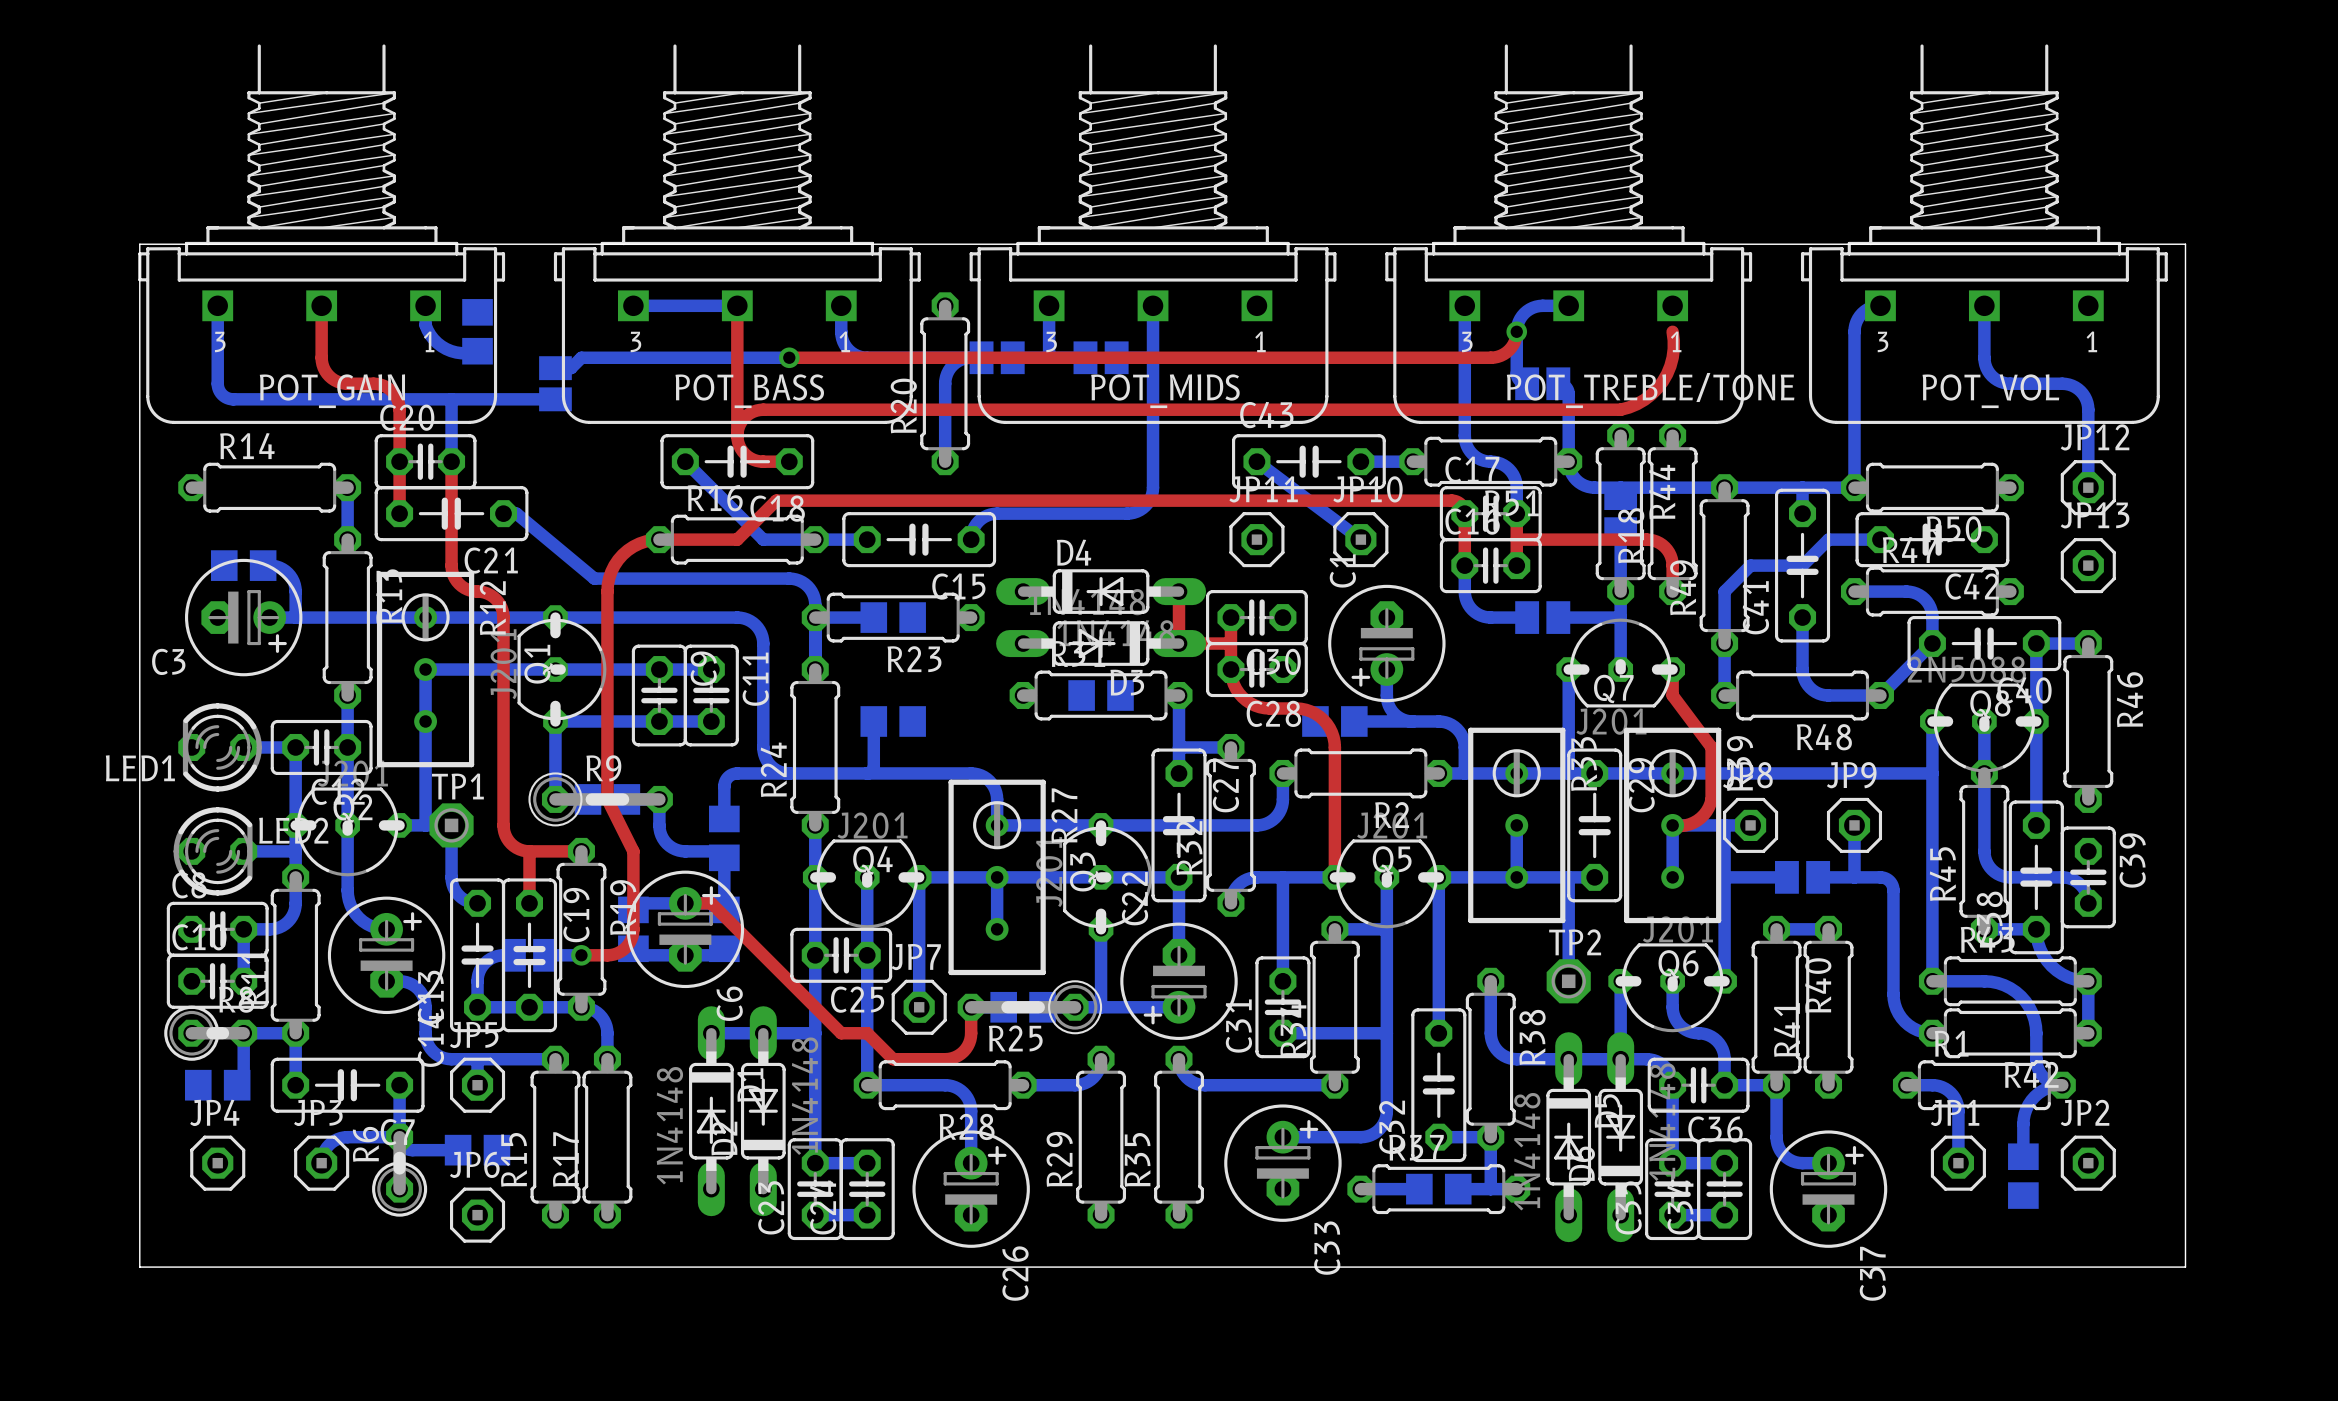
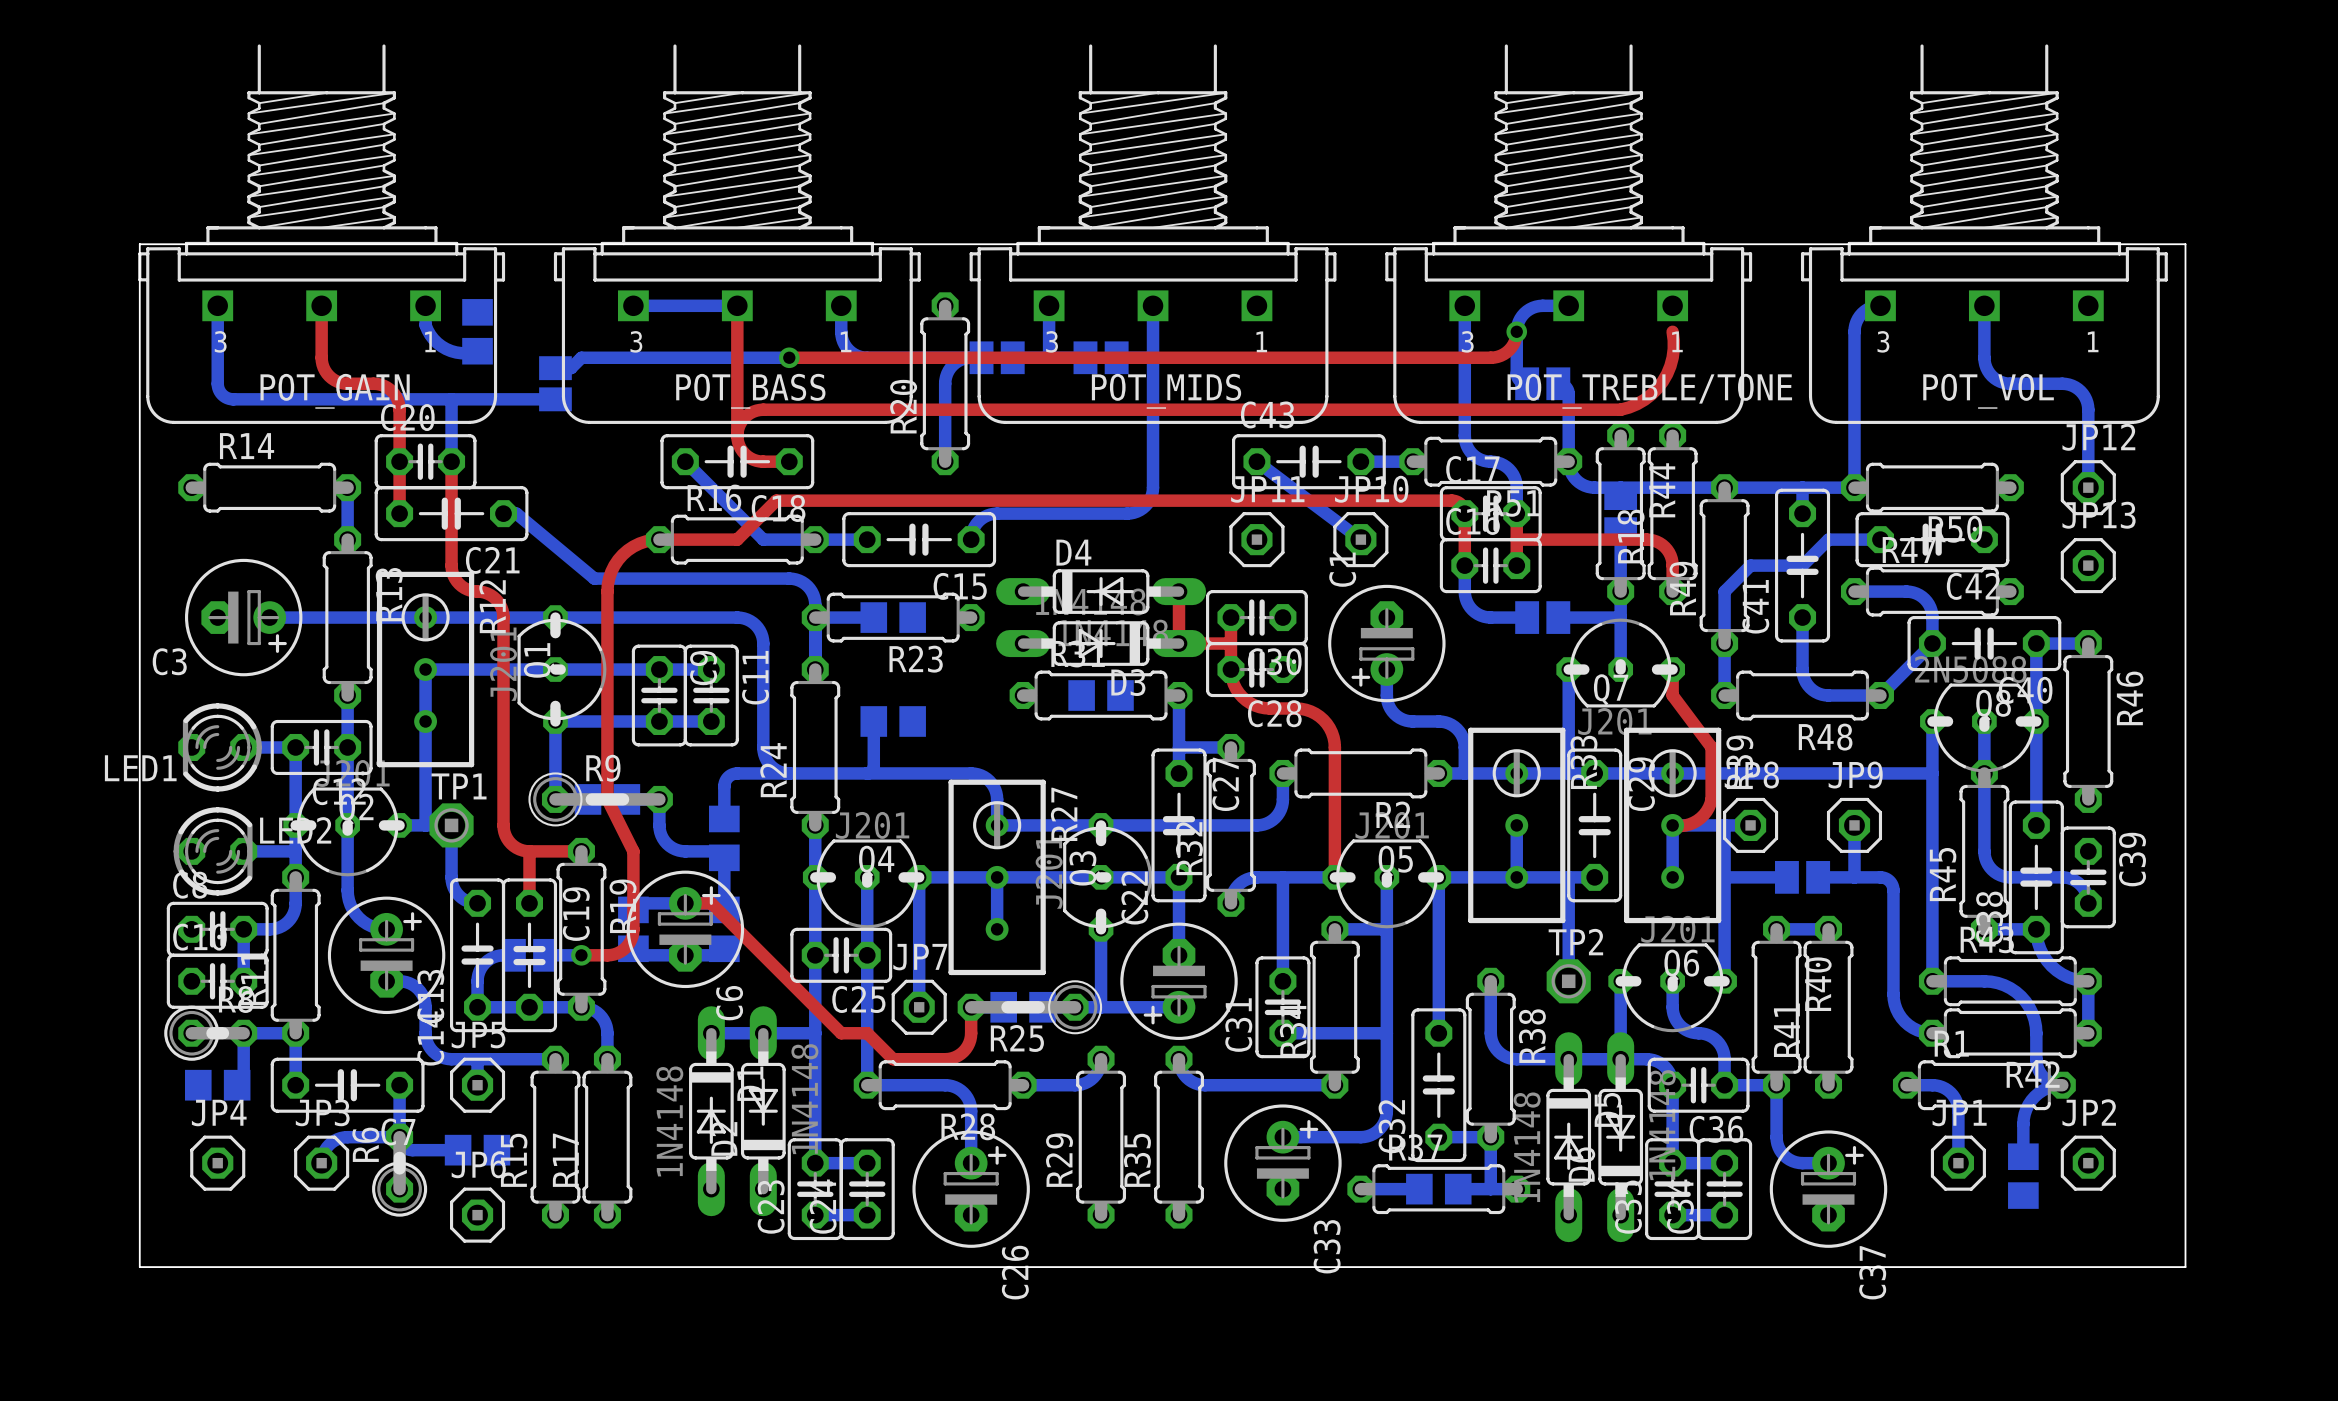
part: (243, 565) -> none
bottom track: (263, 565) (279, 567) (292, 578) (295, 588) (295, 617) -> none
part: (1334, 721) -> none
bottom track: (1354, 721) (1412, 721) -> none

